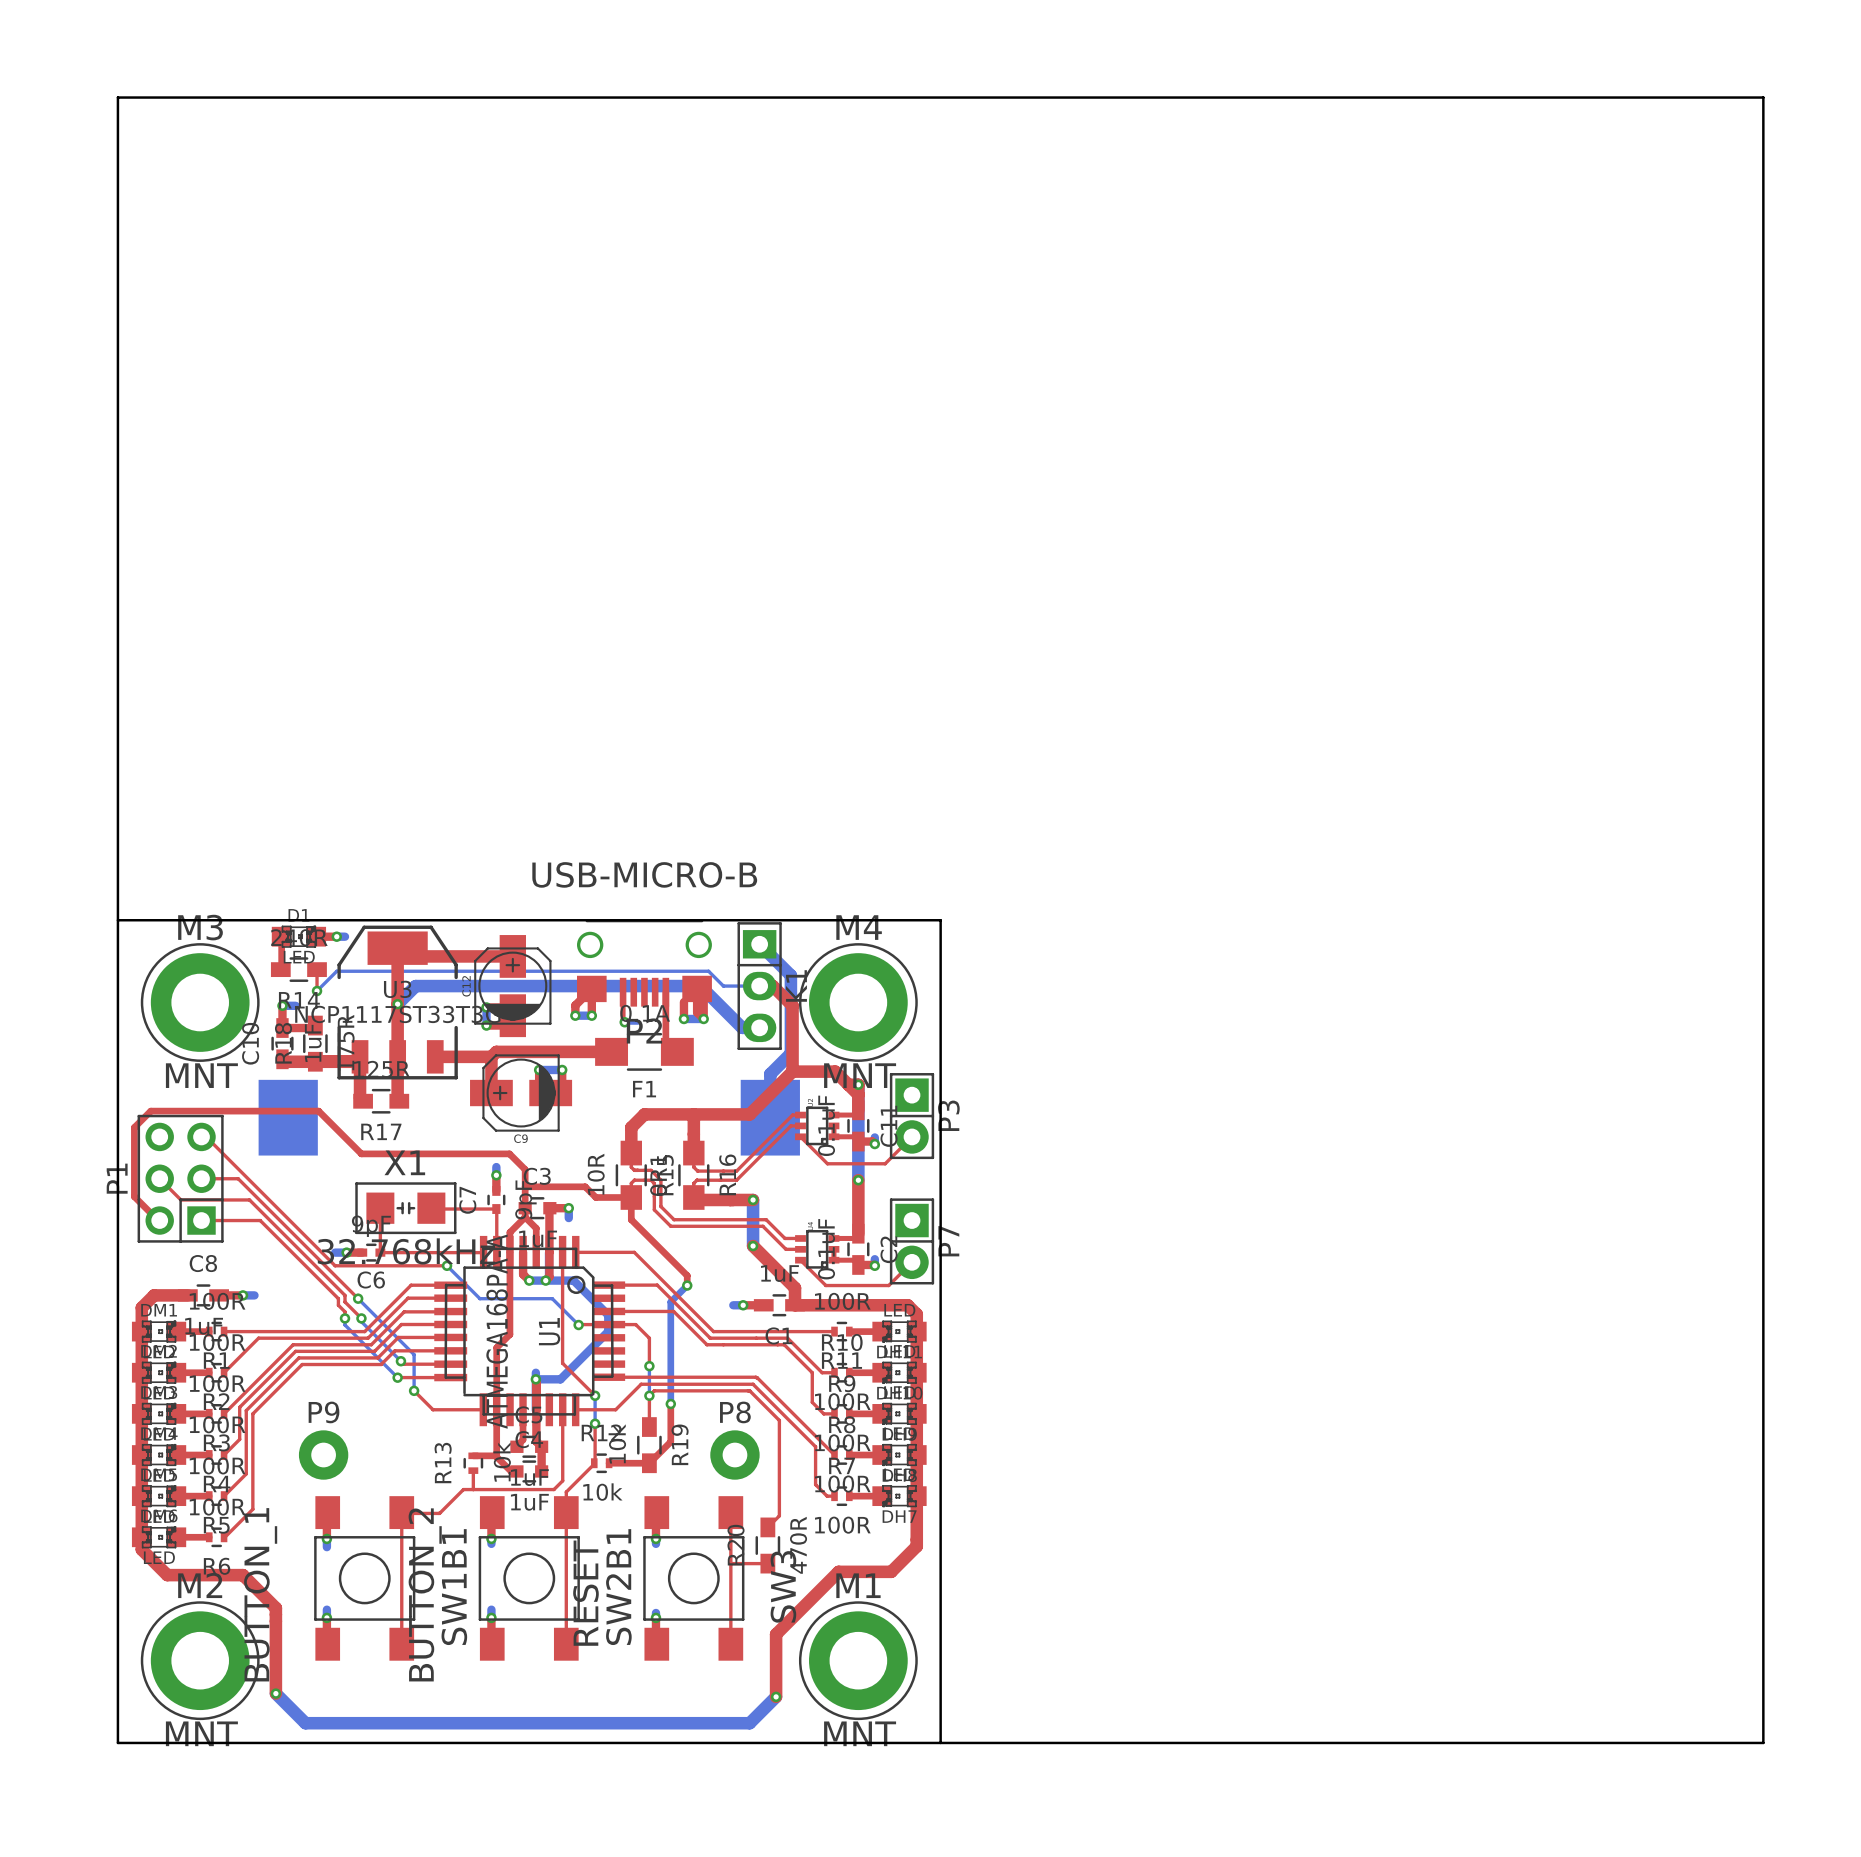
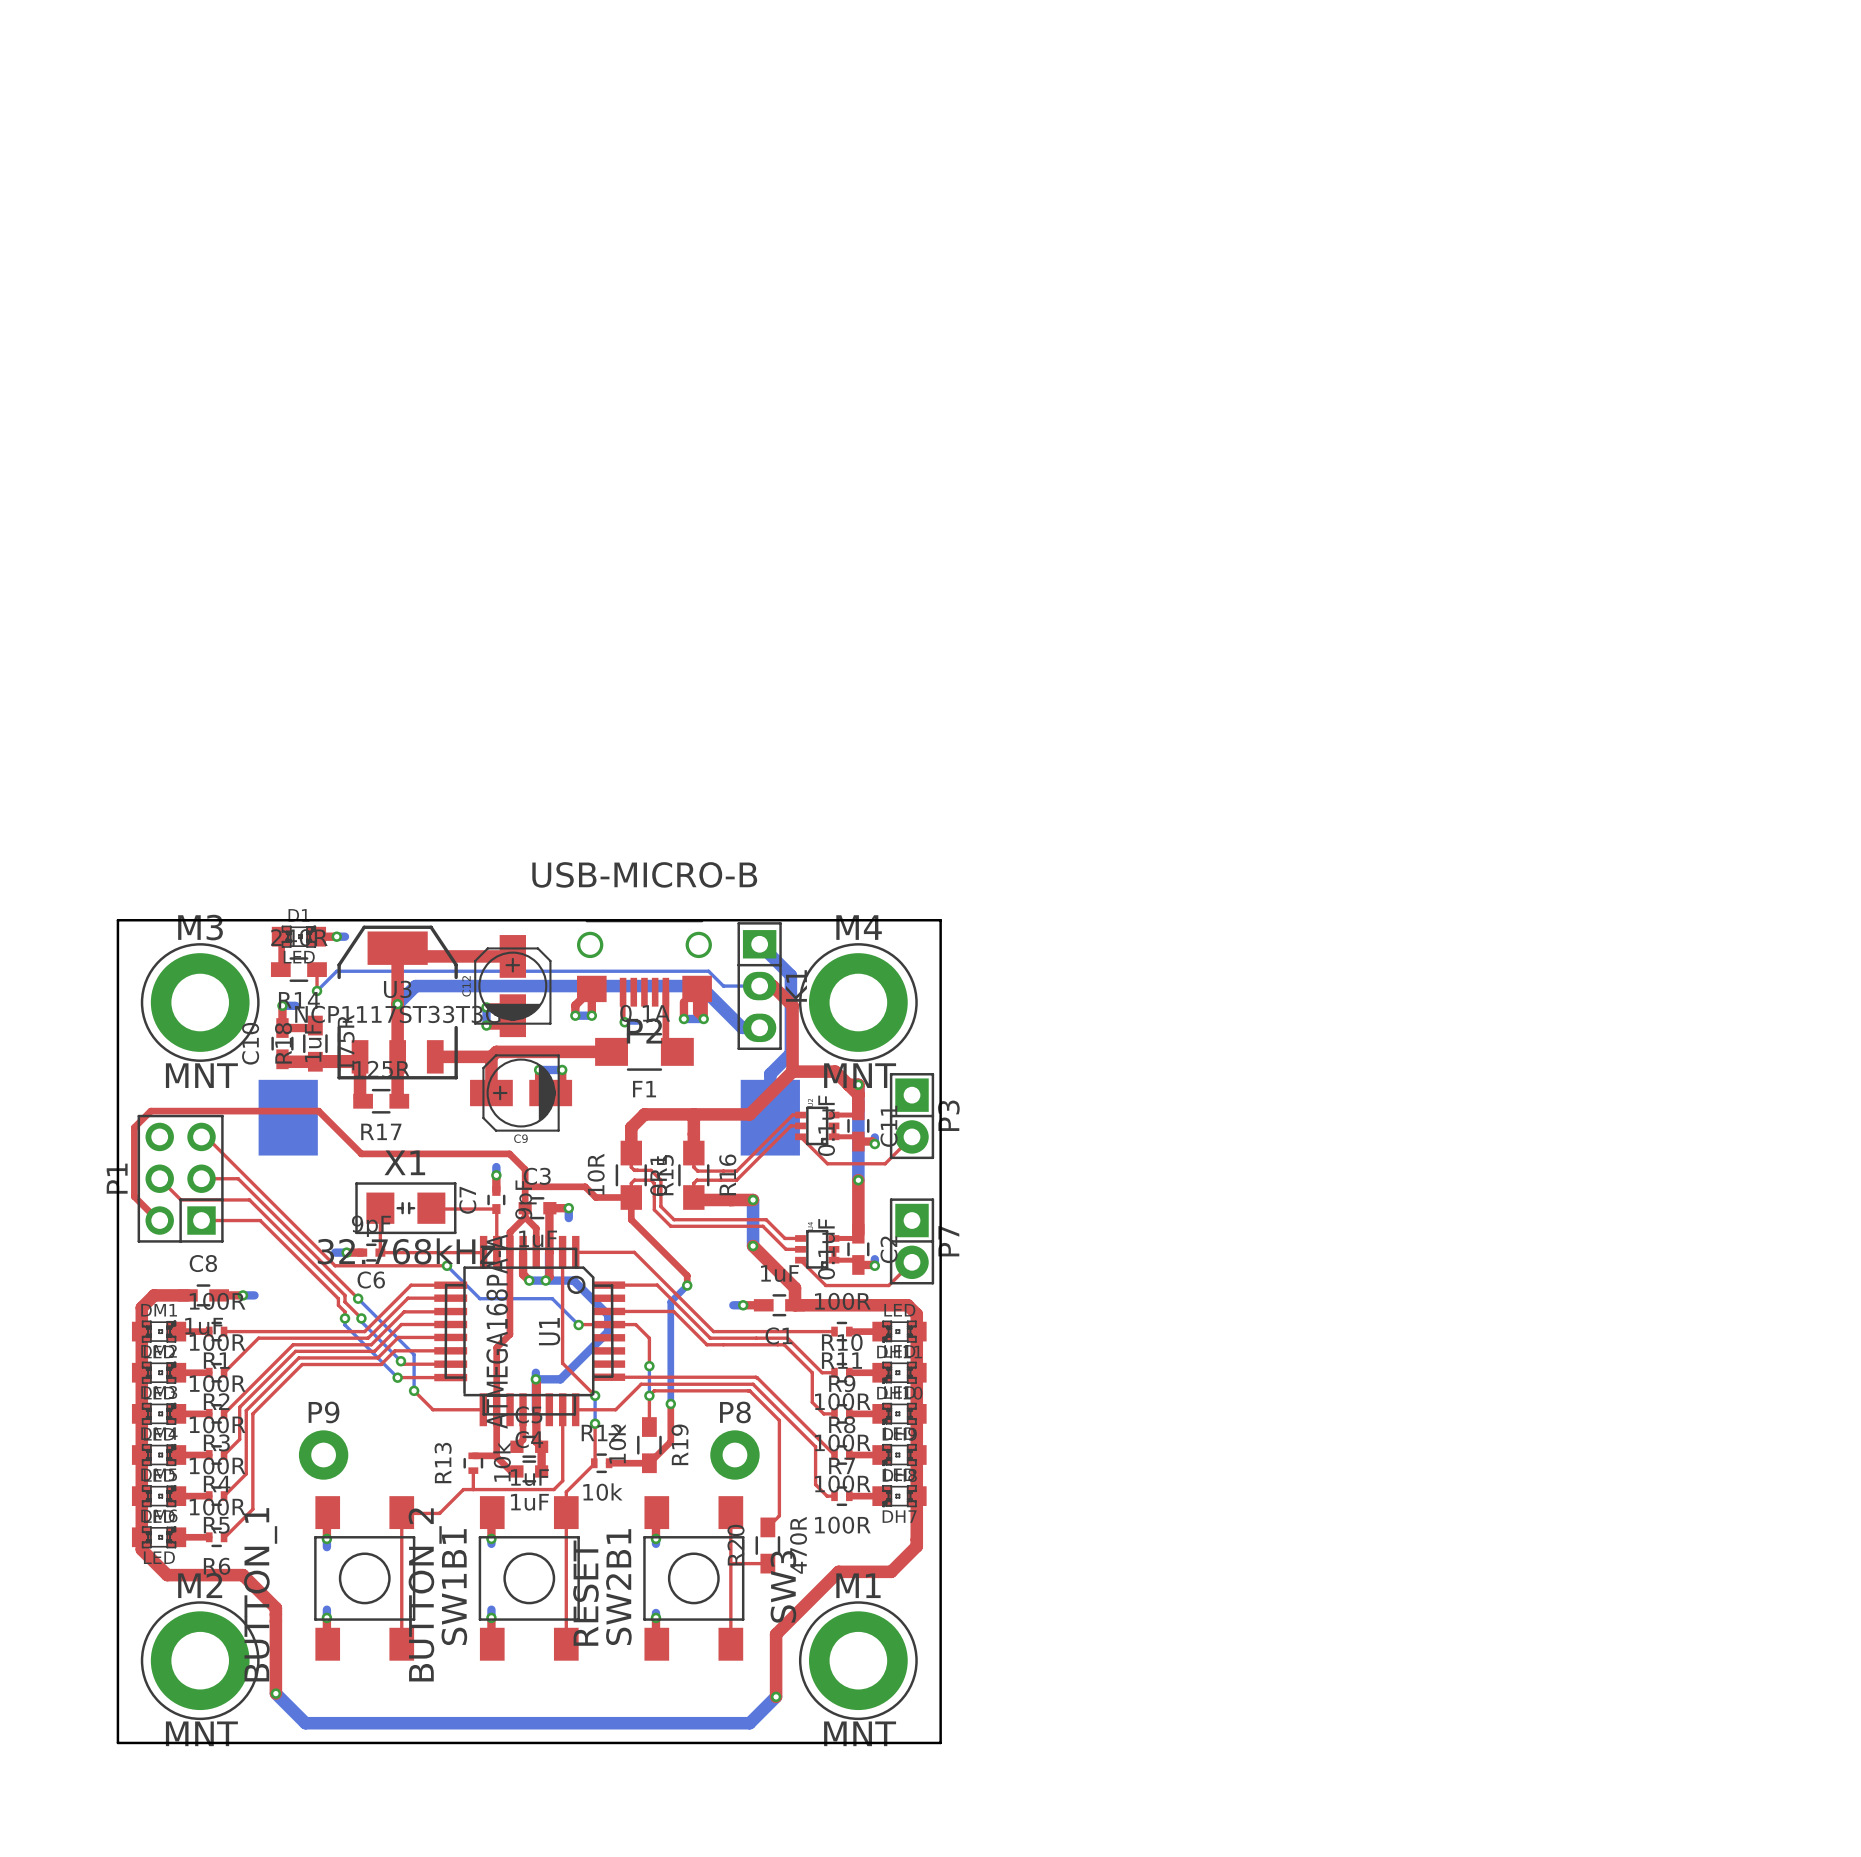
board edge: (117, 920) (117, 97) (1763, 97) (1763, 1742) (940, 1742) -> none

